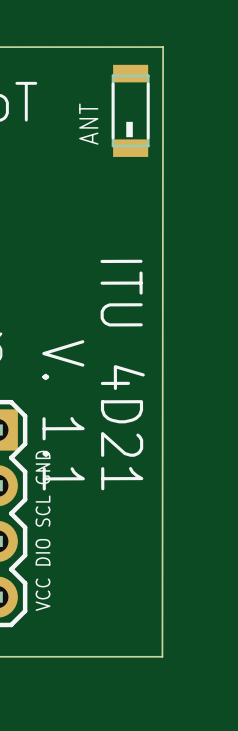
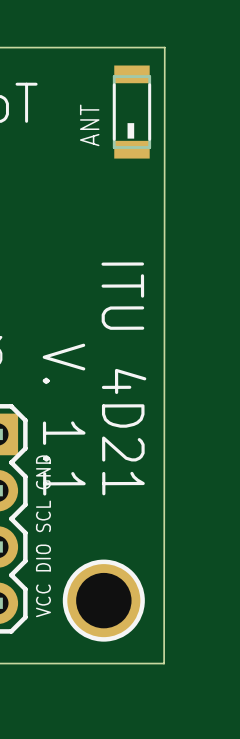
part: none -> (103, 600)

